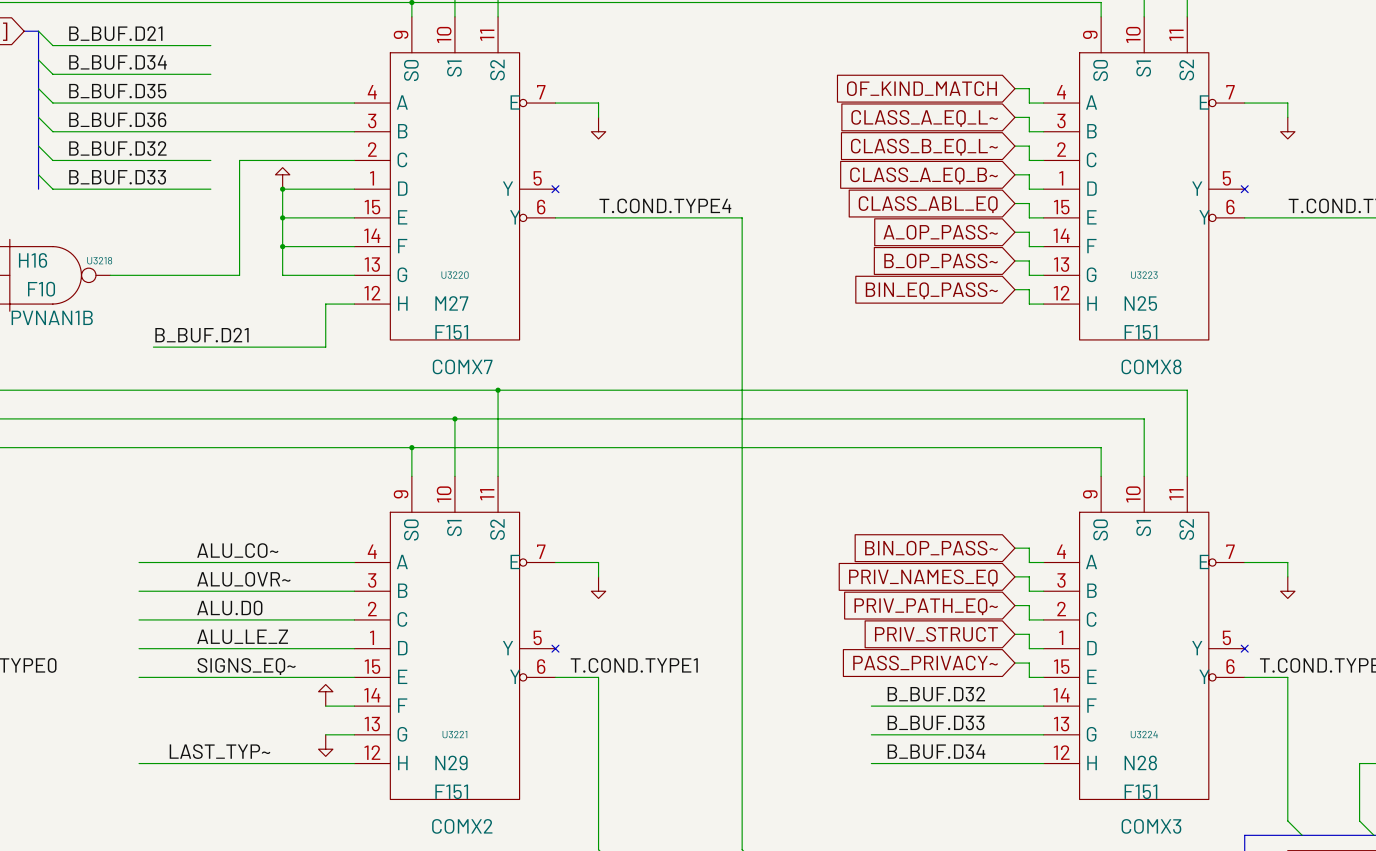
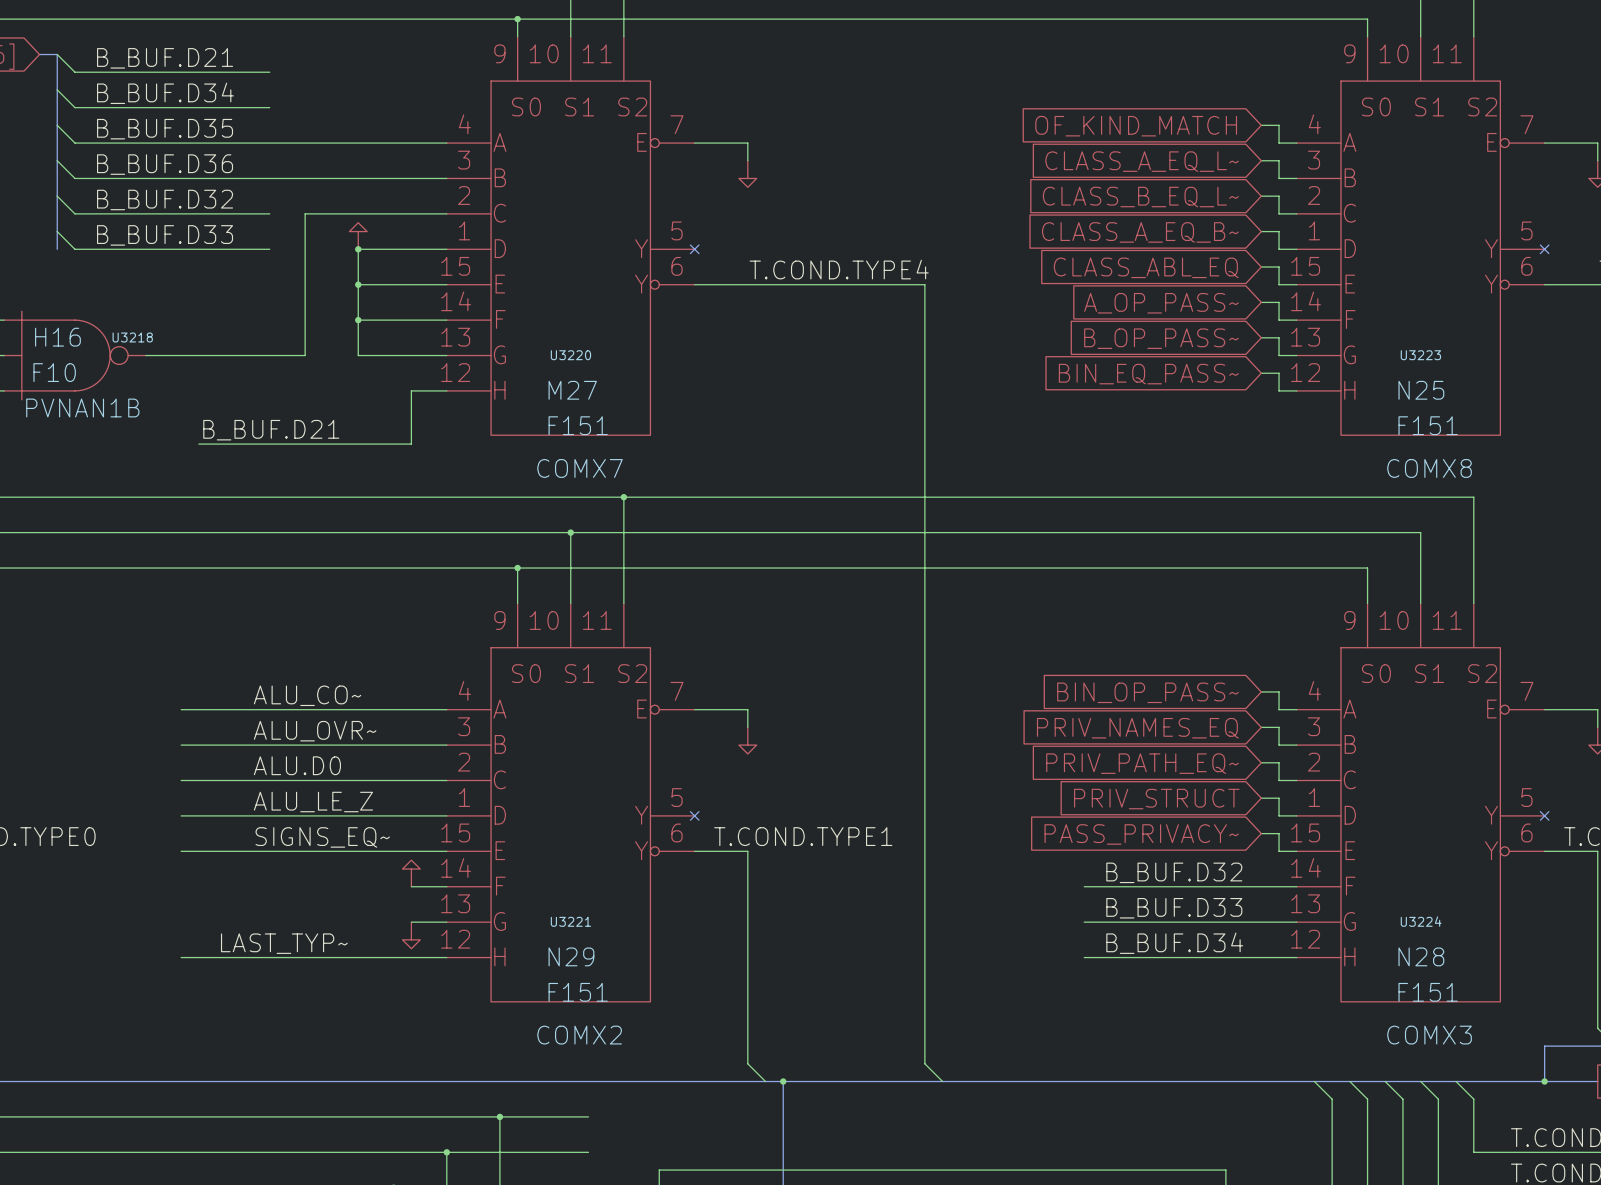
U3220 symbol: [354, 16, 556, 340] -> [446, 36, 695, 436]
U3223 symbol: [1043, 16, 1245, 340] -> [1296, 36, 1545, 436]
U3221 symbol: [354, 476, 556, 800] -> [446, 603, 695, 1002]
U3224 symbol: [1043, 476, 1245, 800] -> [1296, 603, 1545, 1002]

